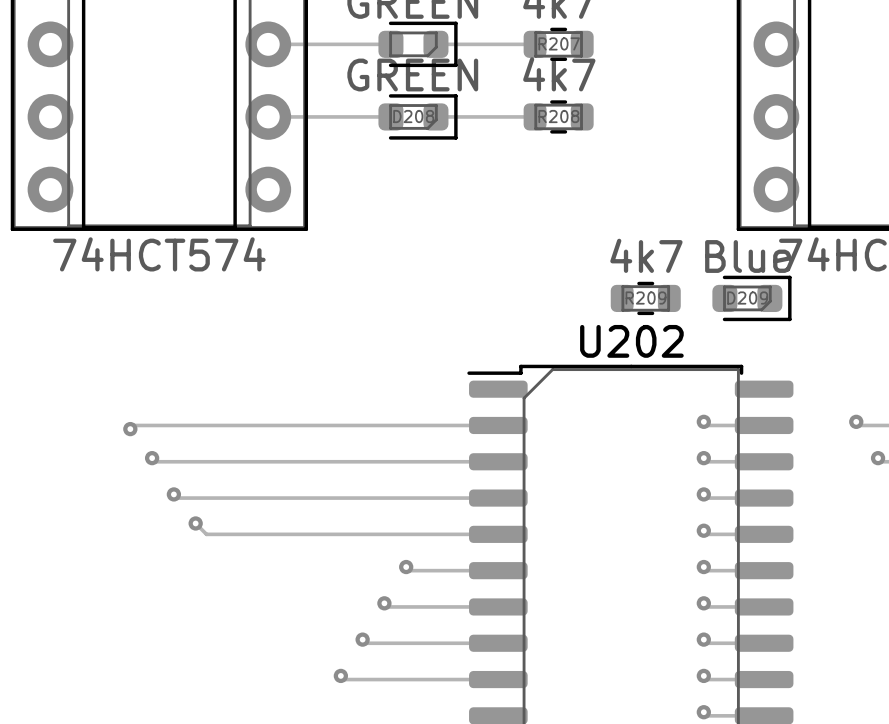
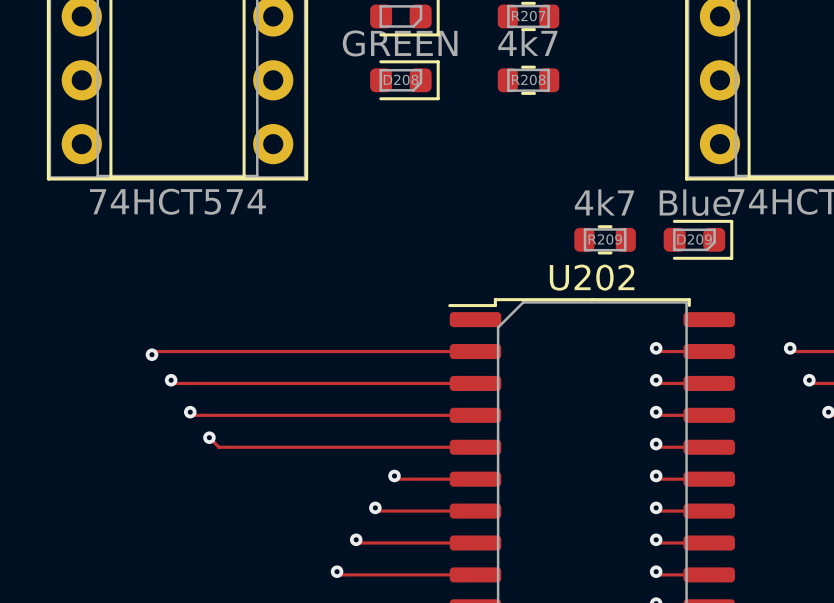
track: (268, 44) (390, 44) -> none
track: (435, 44) (535, 44) -> none
track: (268, 116) (390, 116) -> none
track: (435, 116) (535, 116) -> none

